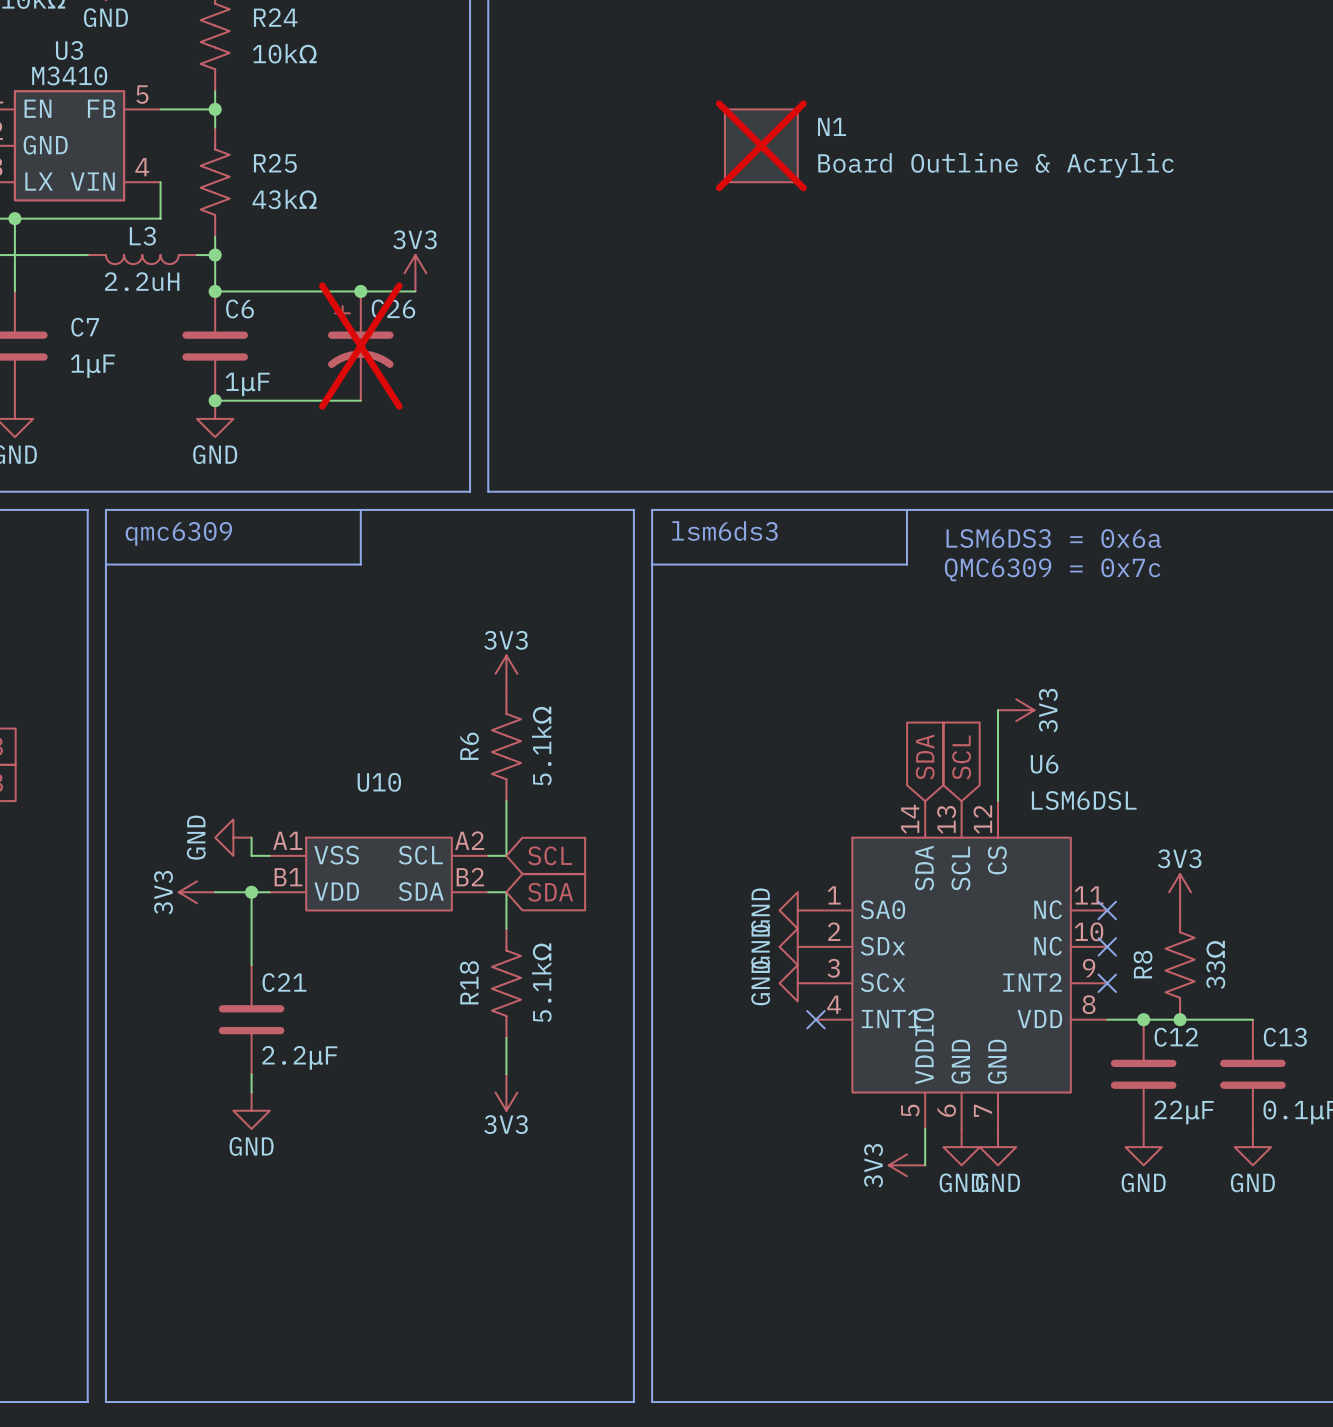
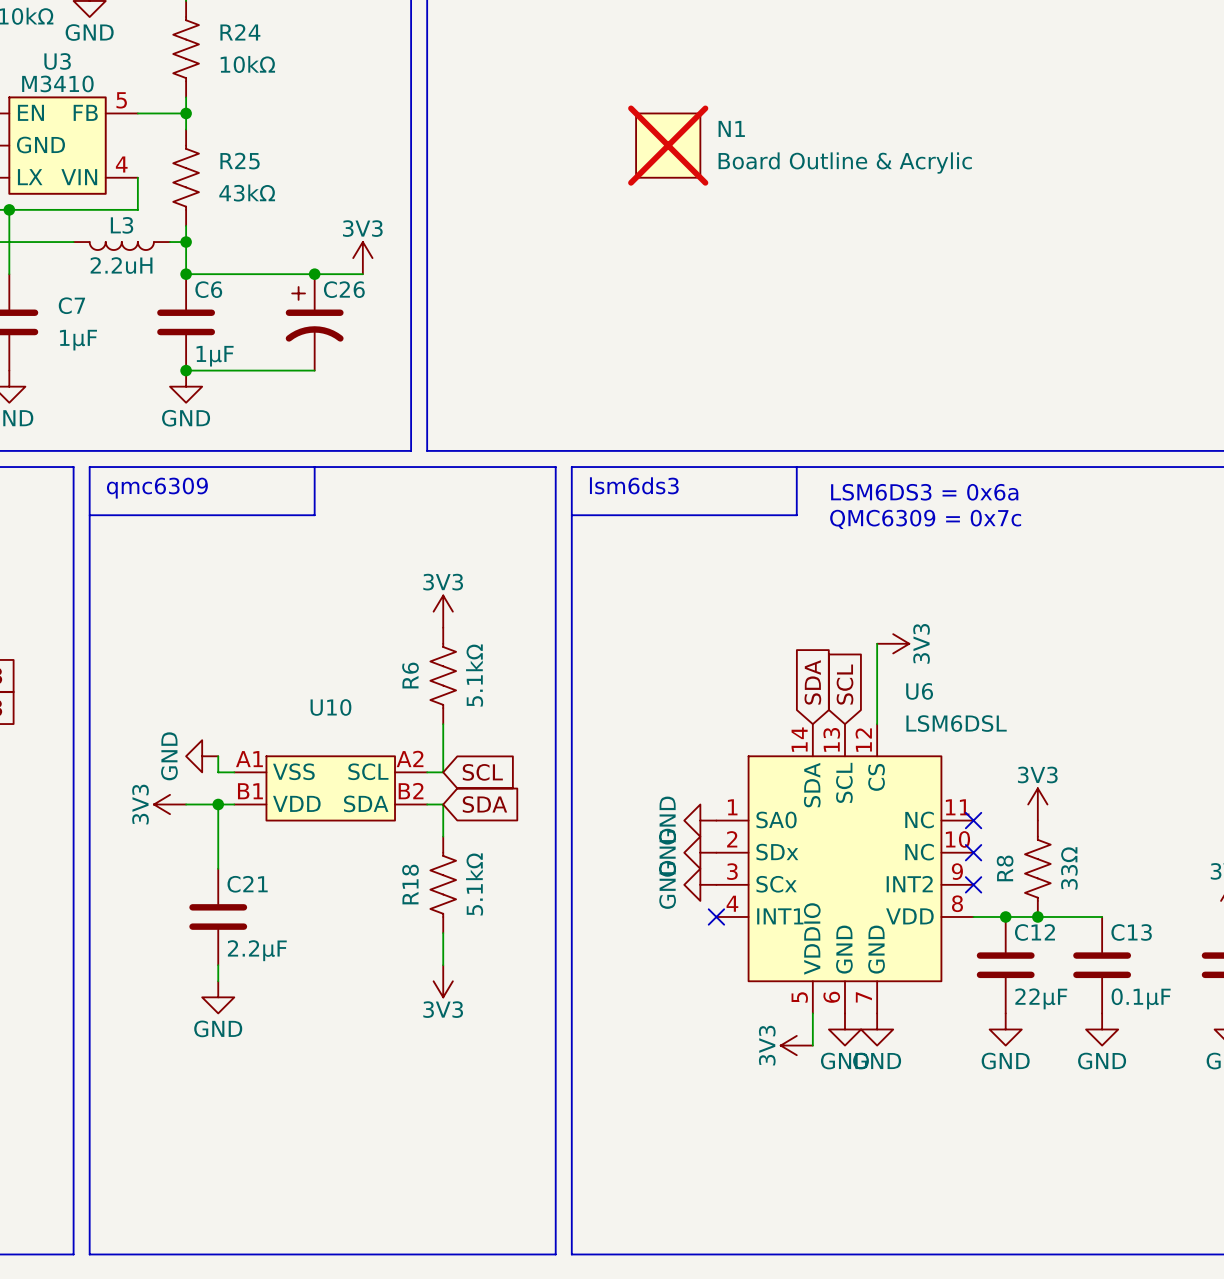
C26 do-not-place cross: (360, 346) -> none

